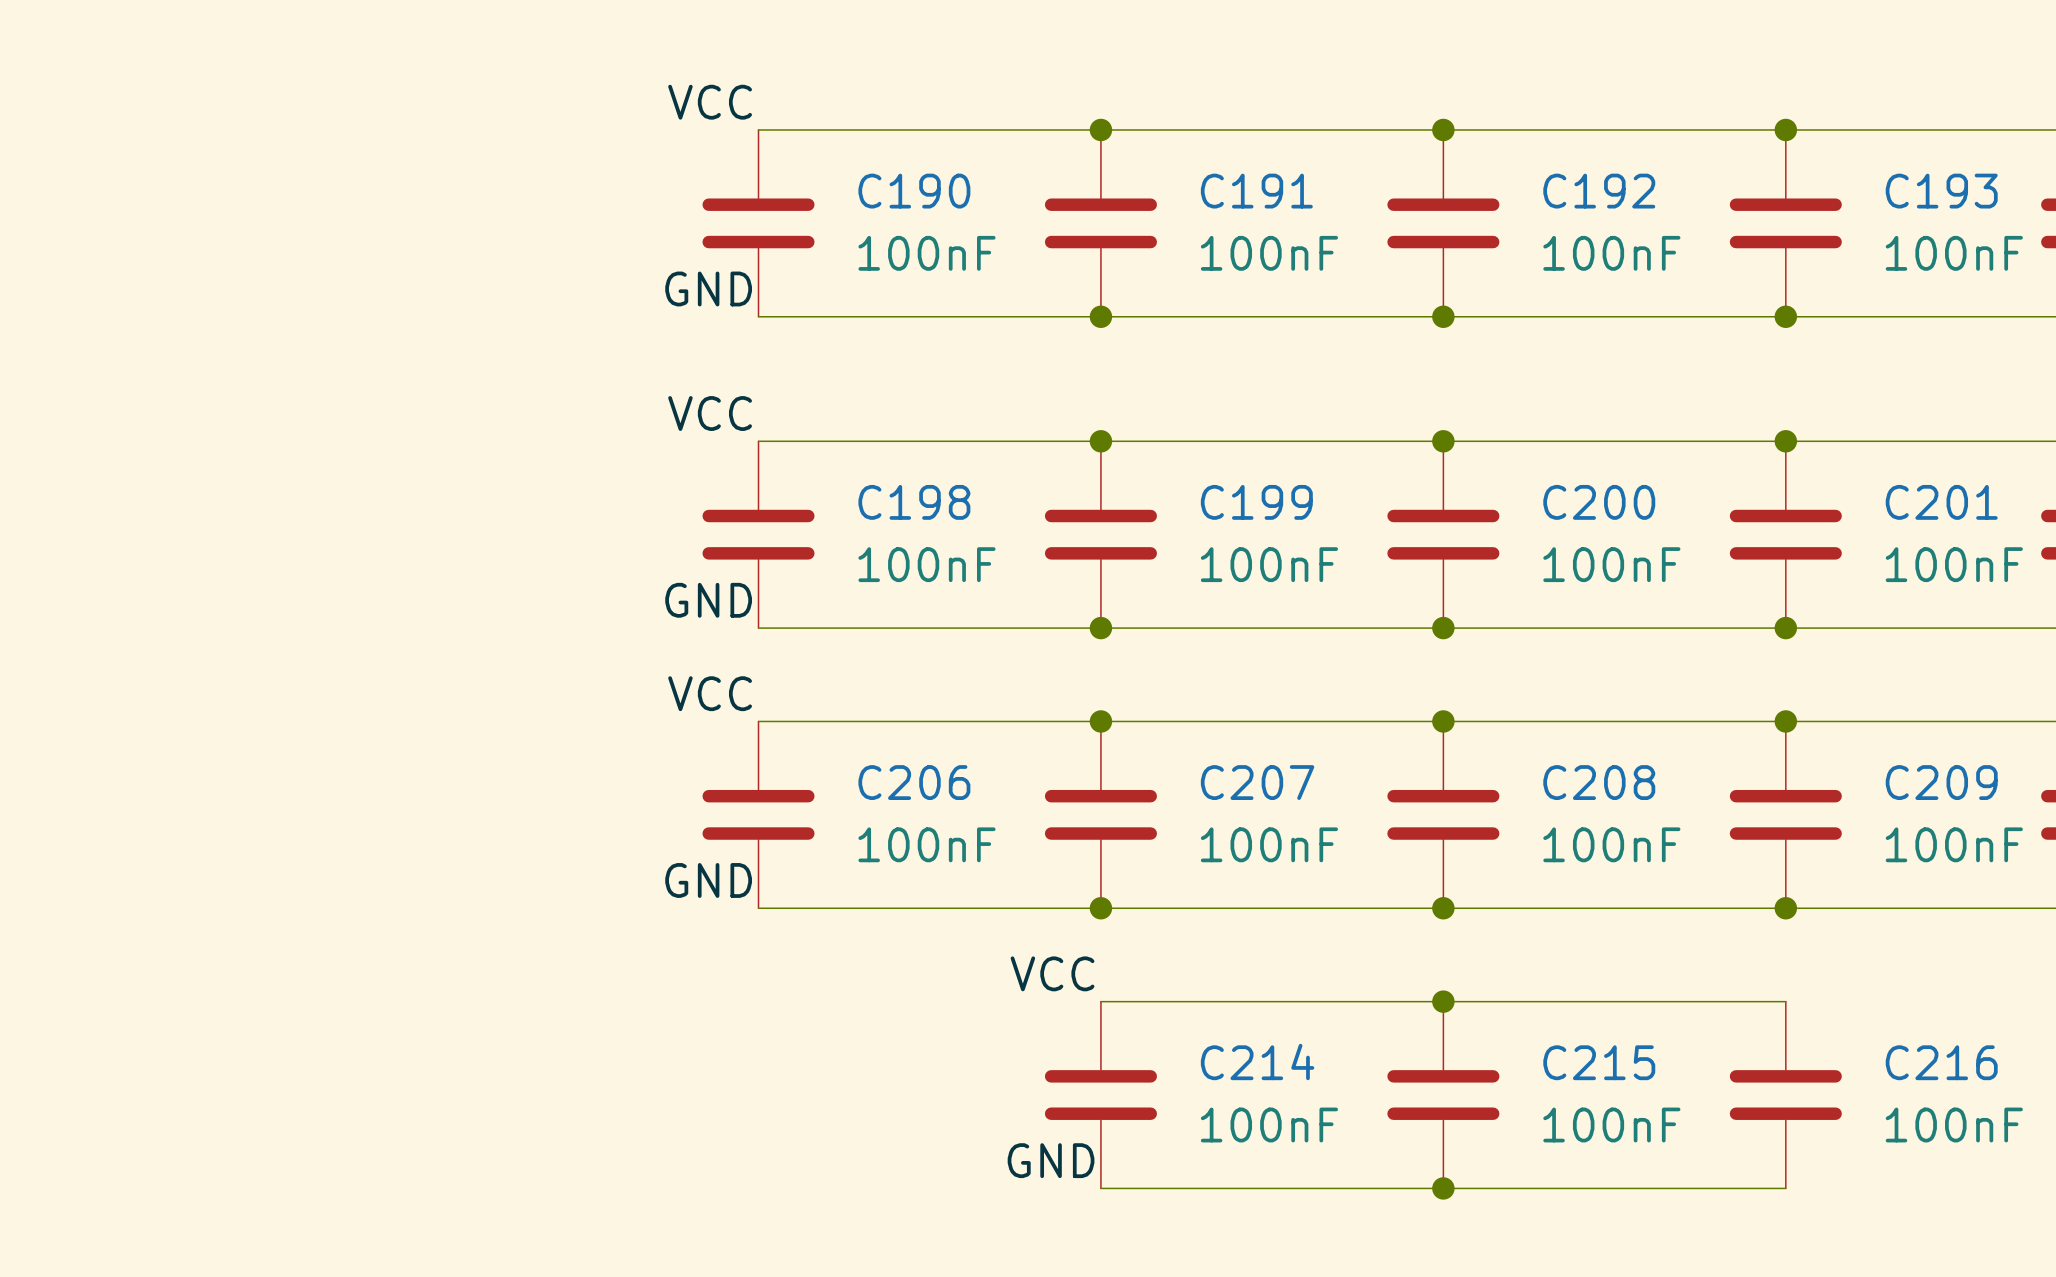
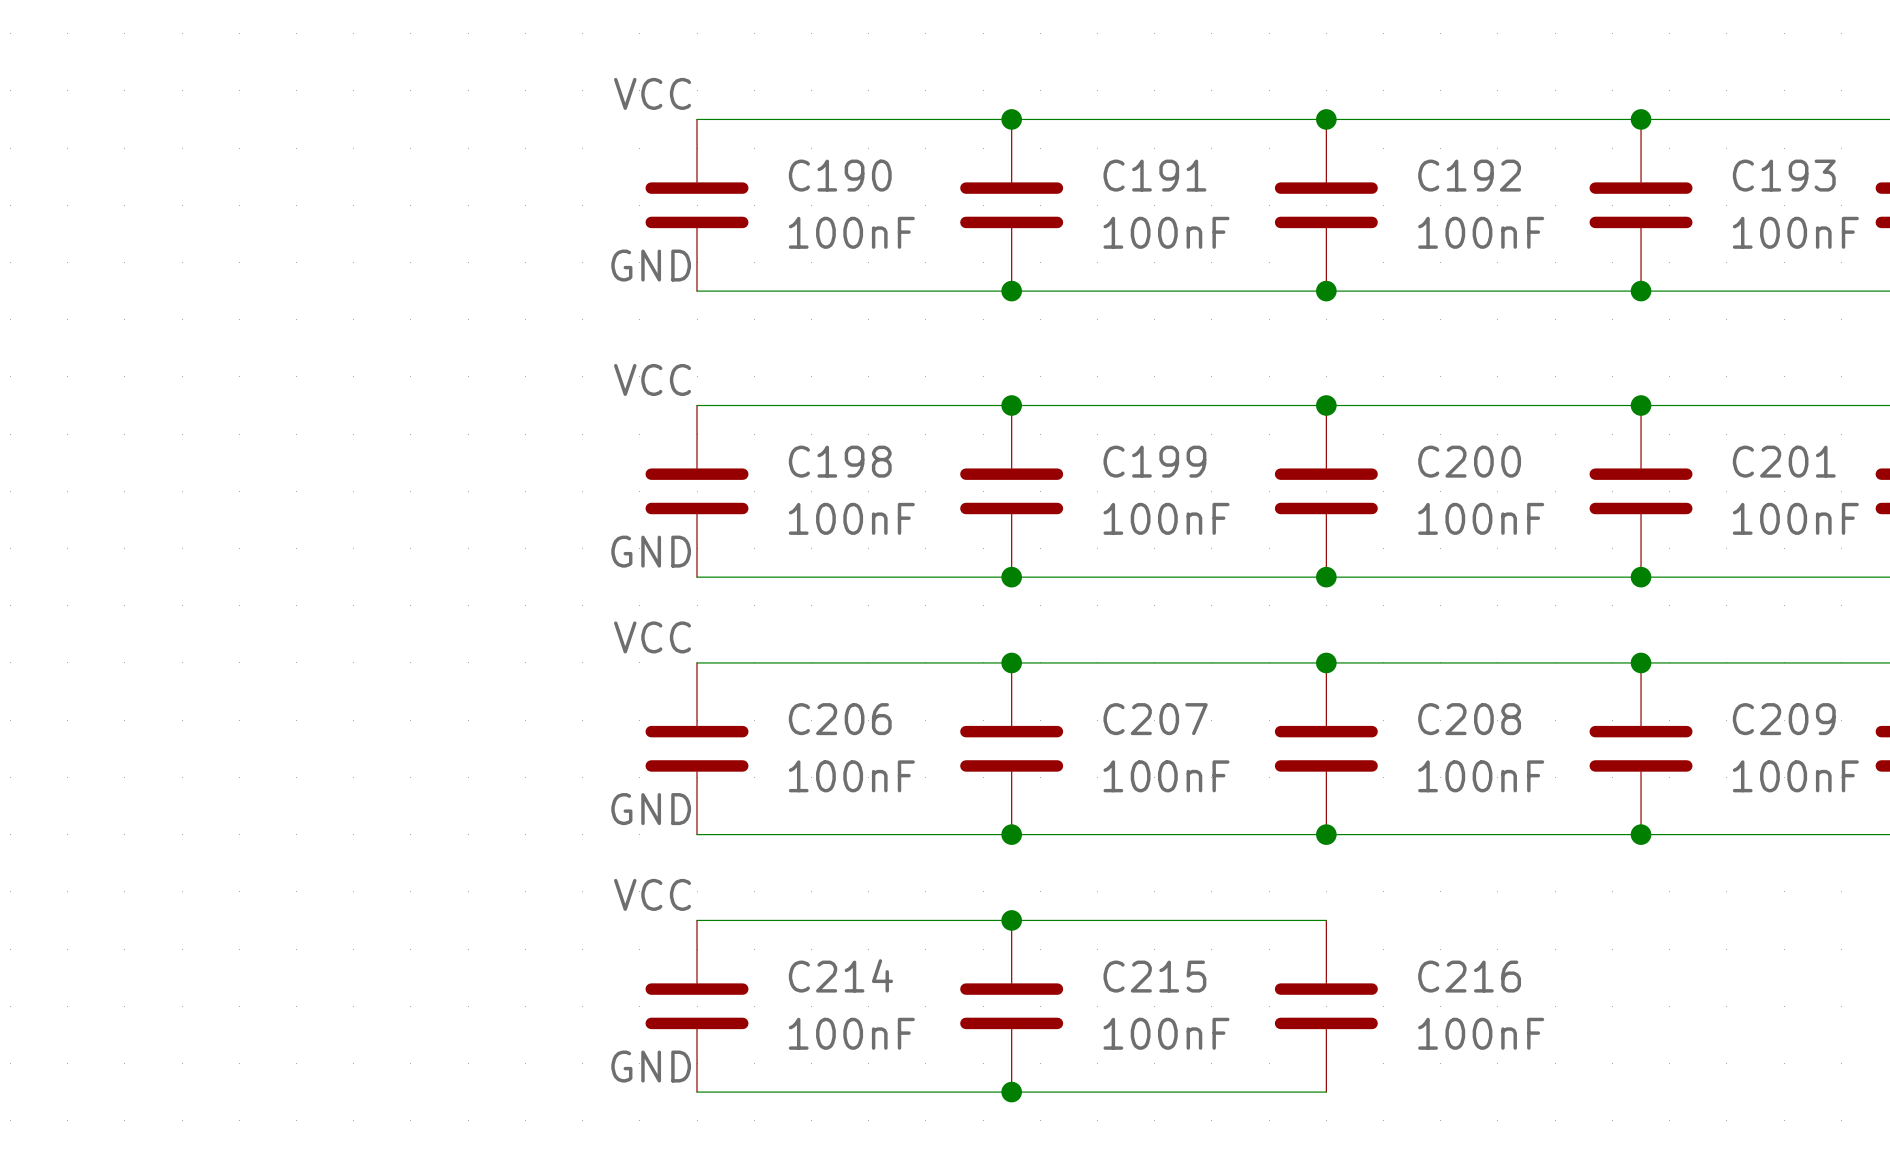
label position: VCC (1052, 973) -> VCC (652, 894)
wire: none -> (697, 920) (1011, 920)
junction: none -> (1011, 920)
wire: (1443, 1001) (1785, 1001) -> none
junction: (1443, 1001) -> none
C214 name: C214 (1257, 1062) -> C215 (1154, 976)
C215 name: C215 (1599, 1062) -> C216 (1469, 976)
C214: none -> 100nF (697, 1006)
C216: 100nF (1785, 1095) -> none
label position: GND (1051, 1160) -> GND (651, 1066)
wire: none -> (697, 1092) (1011, 1092)
junction: none -> (1011, 1092)
wire: (1443, 1188) (1785, 1188) -> none
junction: (1443, 1188) -> none

